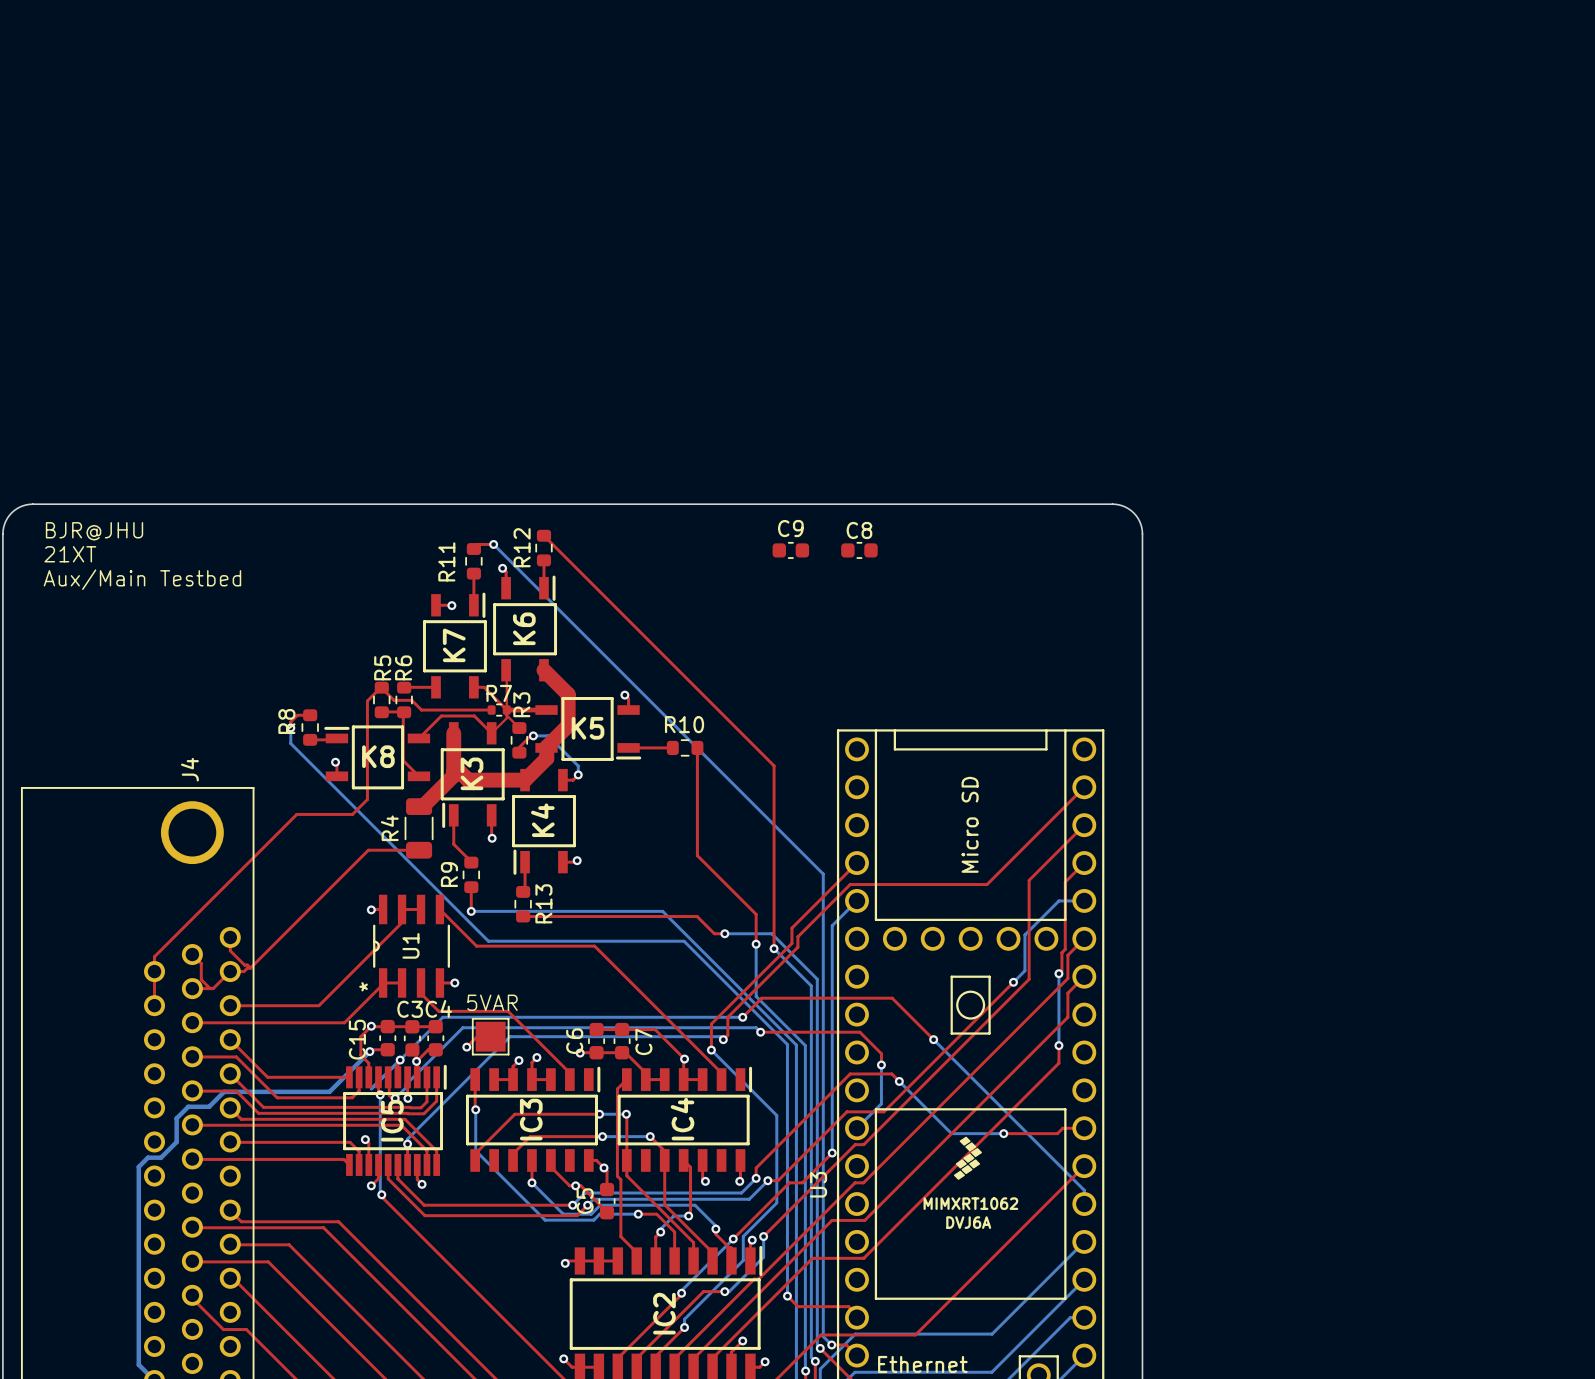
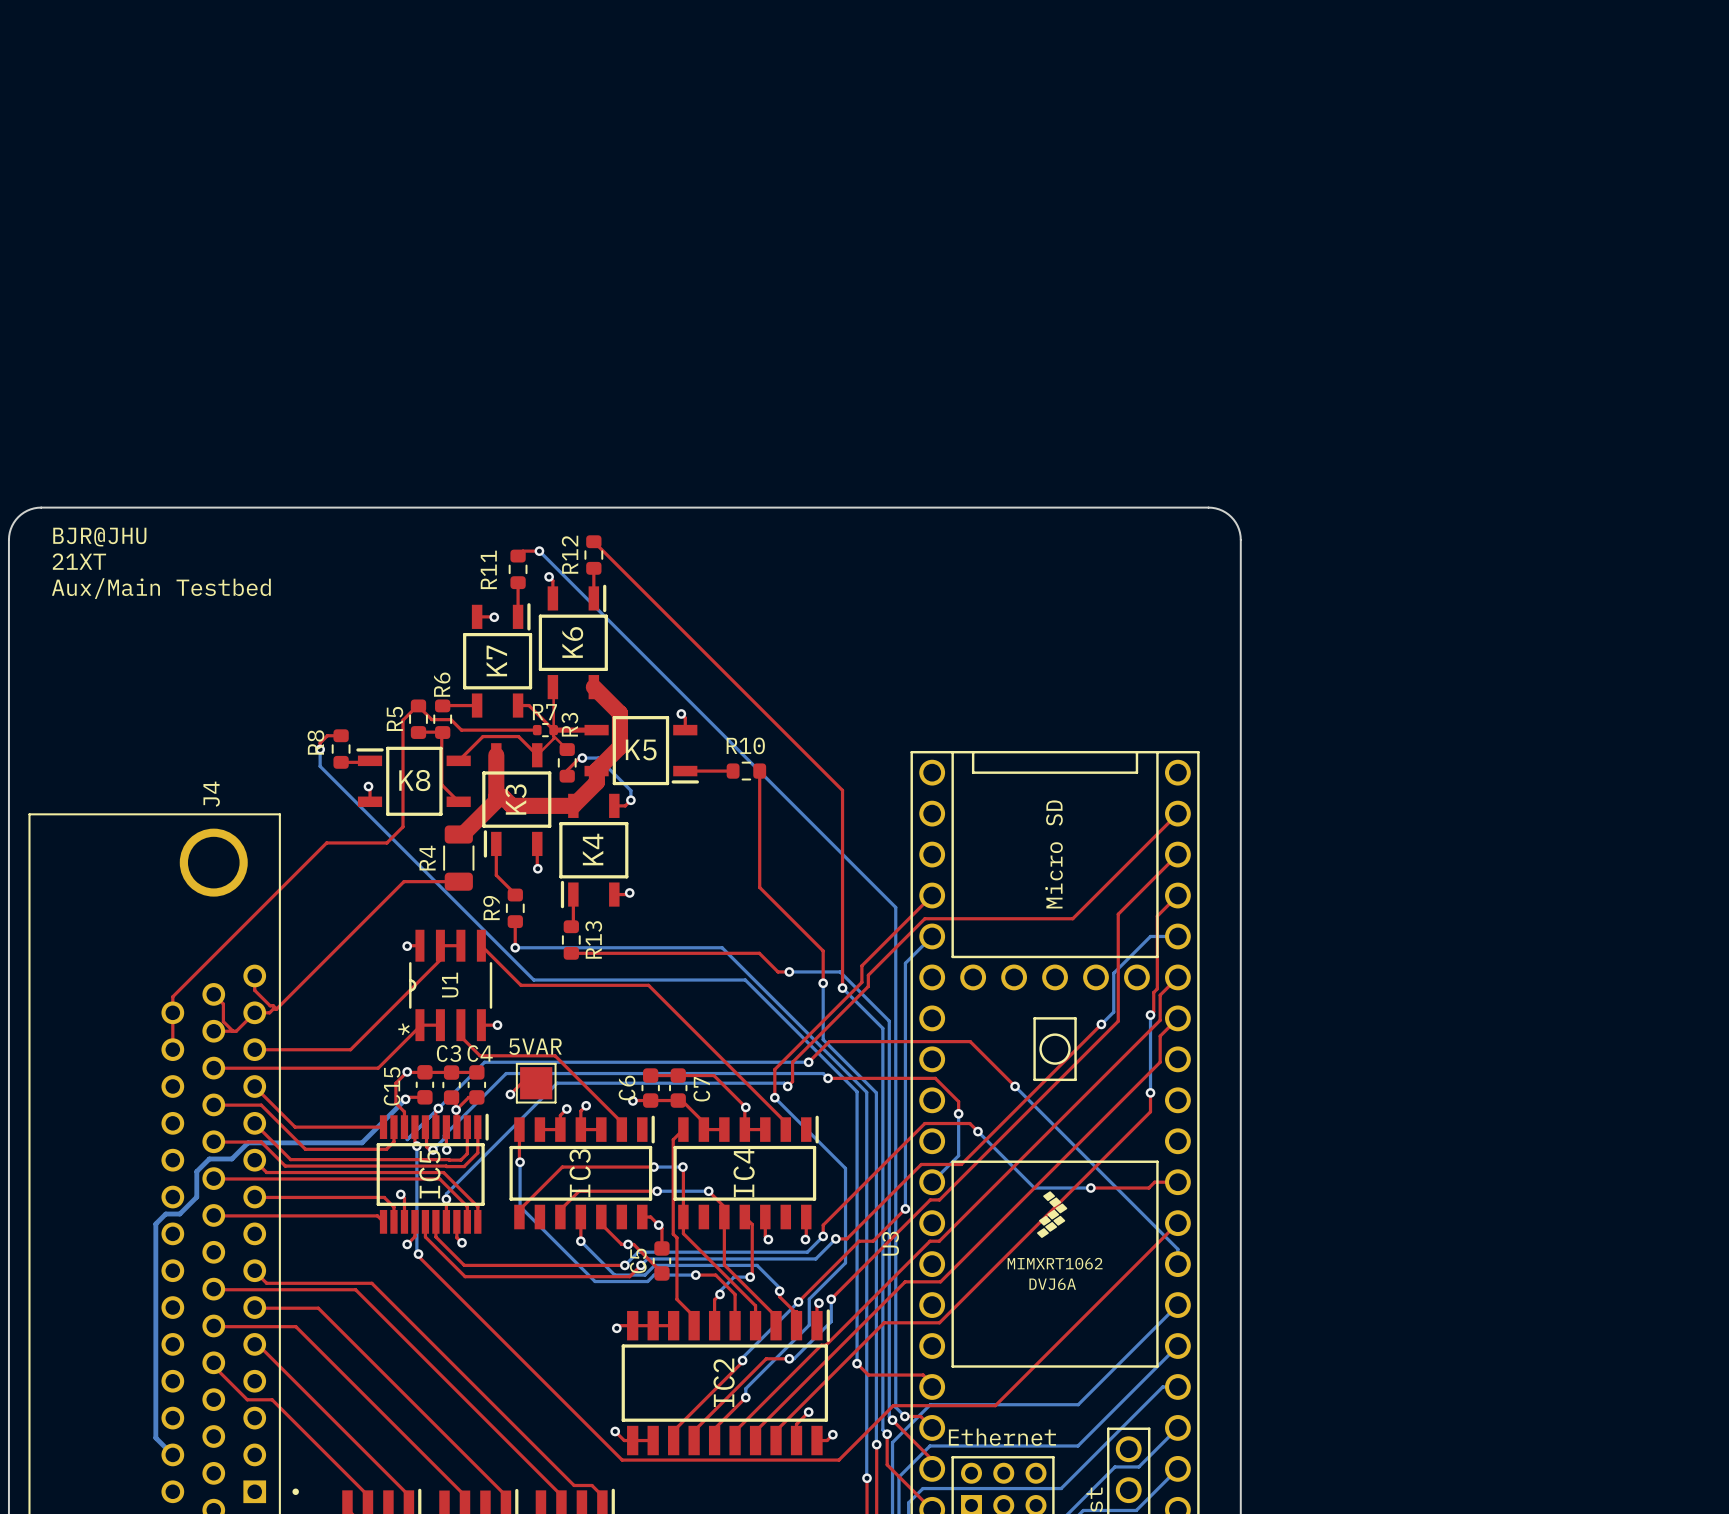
C9: (790, 550) -> none
C8: (859, 550) -> none
R5 name position: R5 (382, 667) -> R5 (394, 718)

